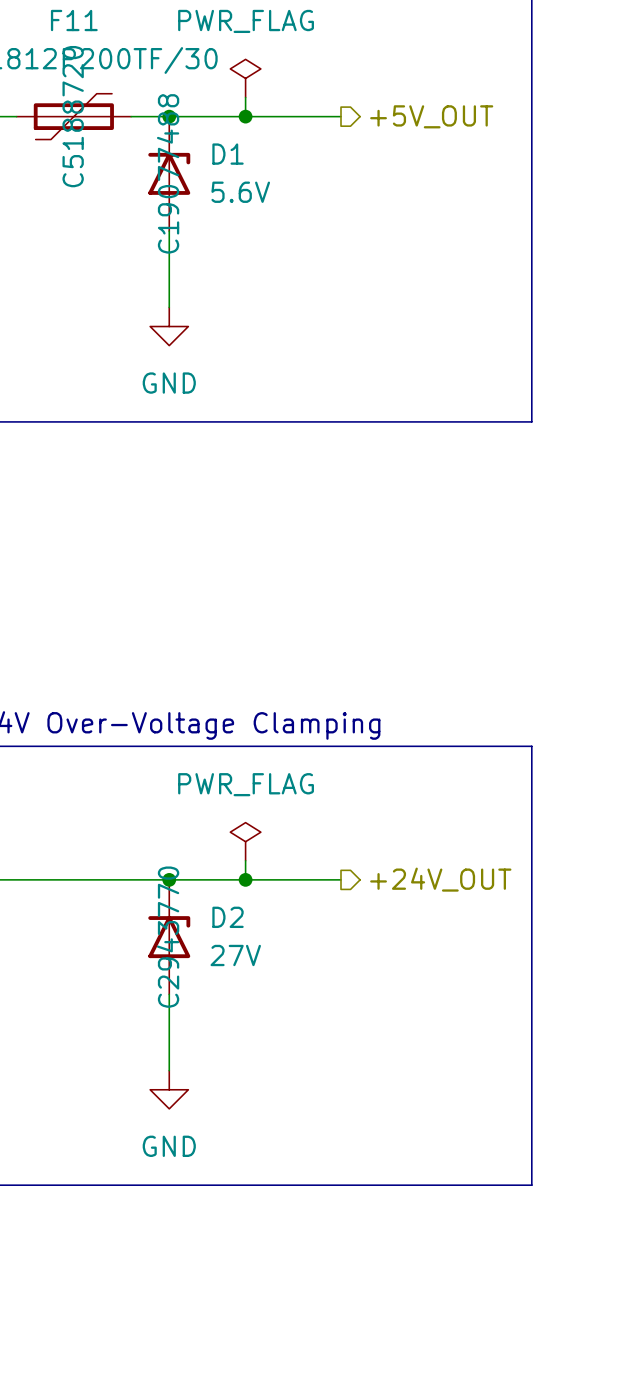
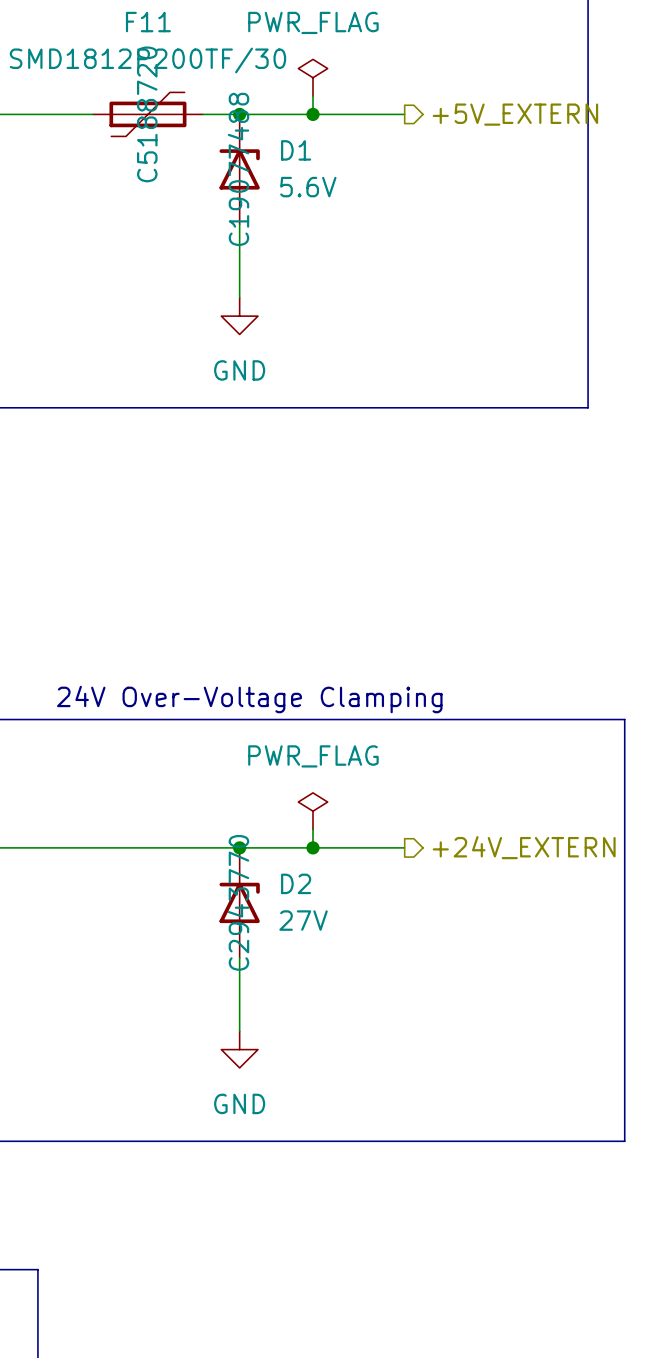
hierarchical label: +5V_OUT (431, 116) -> +5V_EXTERN (515, 114)
line: (531, 746) (531, 1185) -> (588, 719) (624, 719) (624, 1141) (588, 1141)
hierarchical label: +24V_OUT (440, 879) -> +24V_EXTERN (524, 847)

